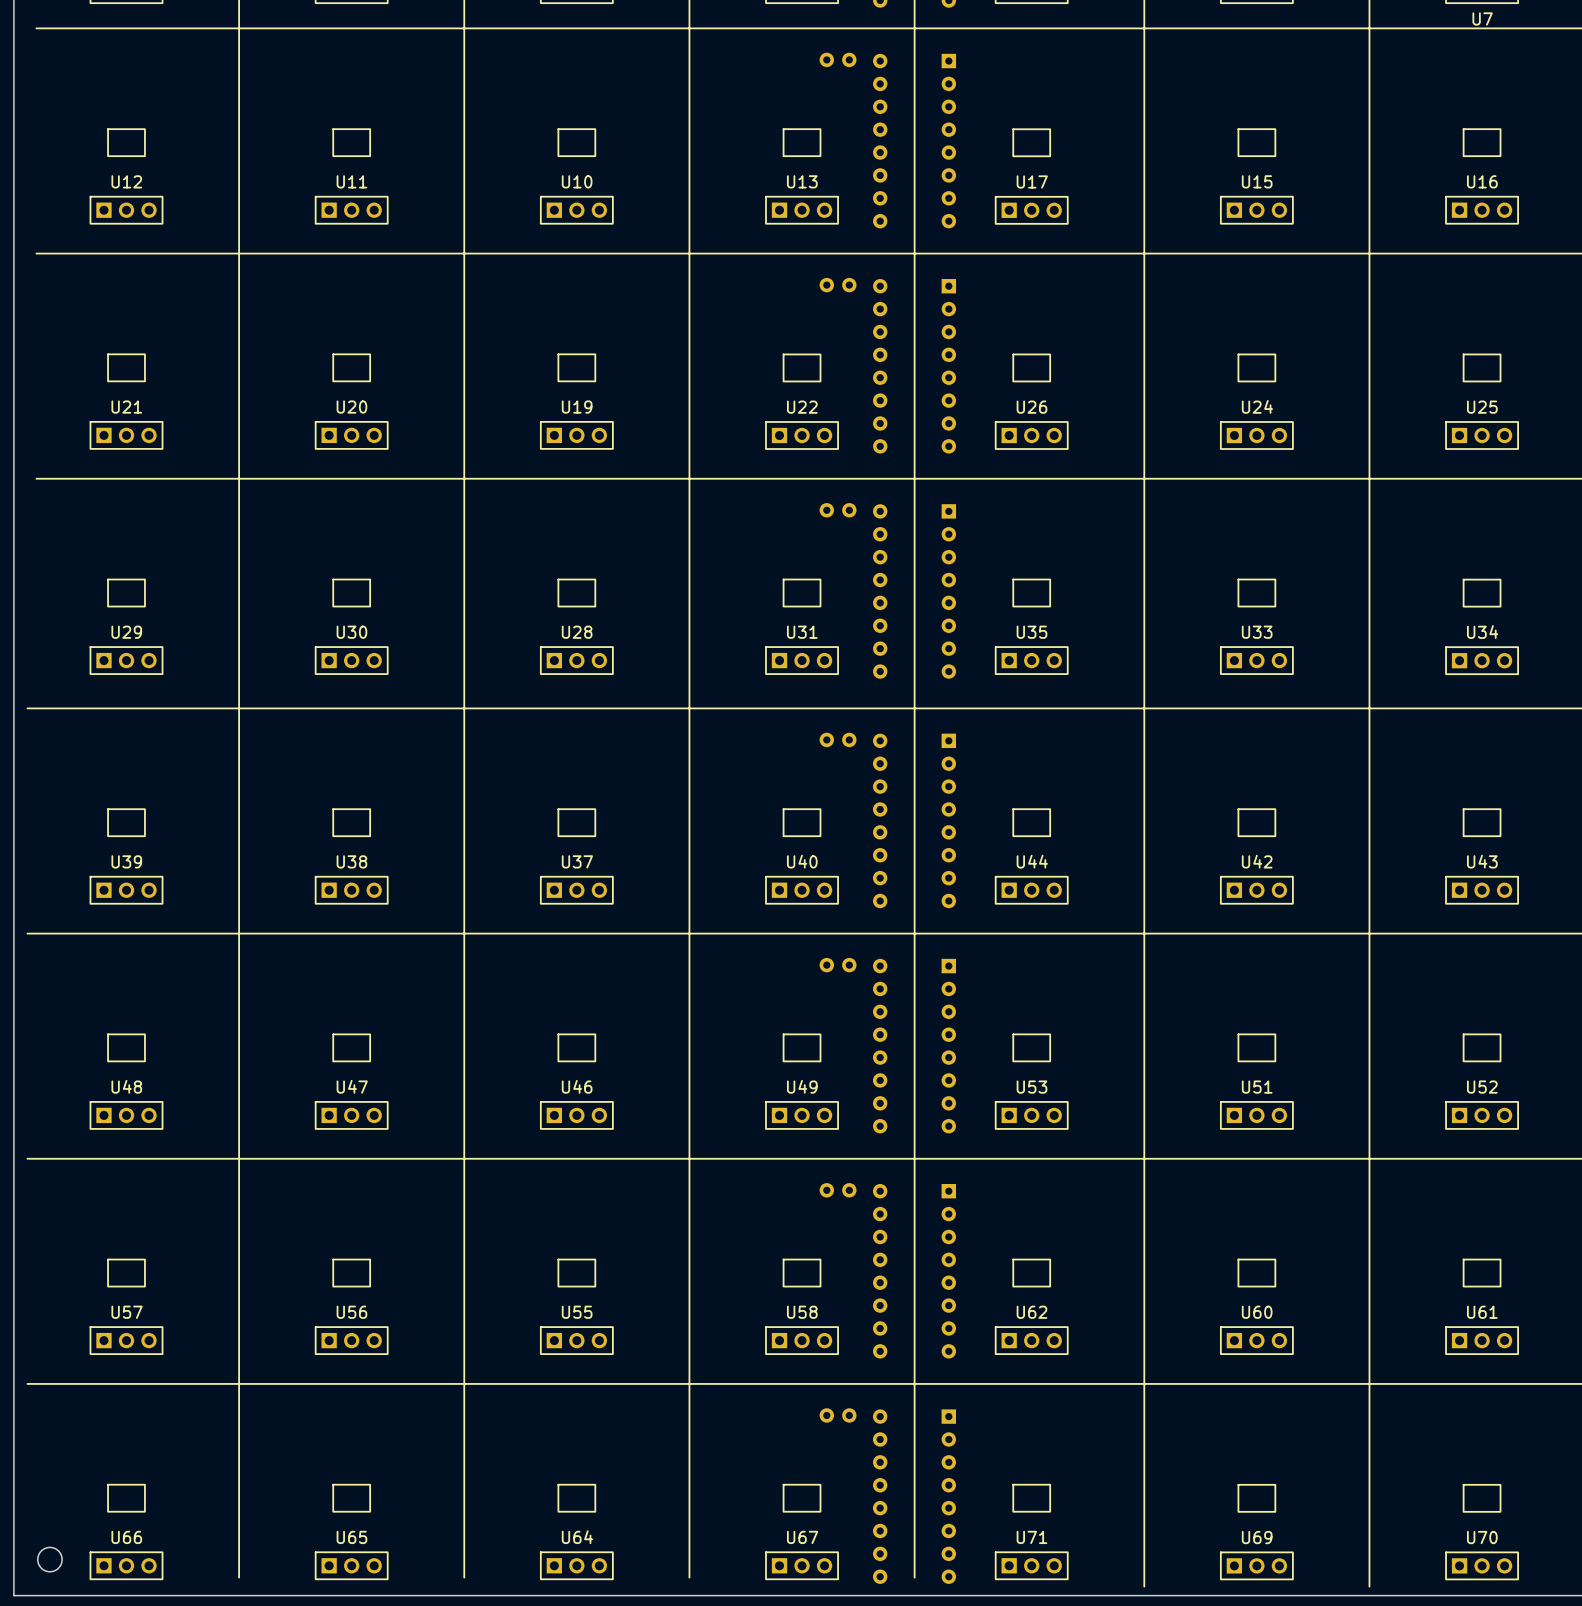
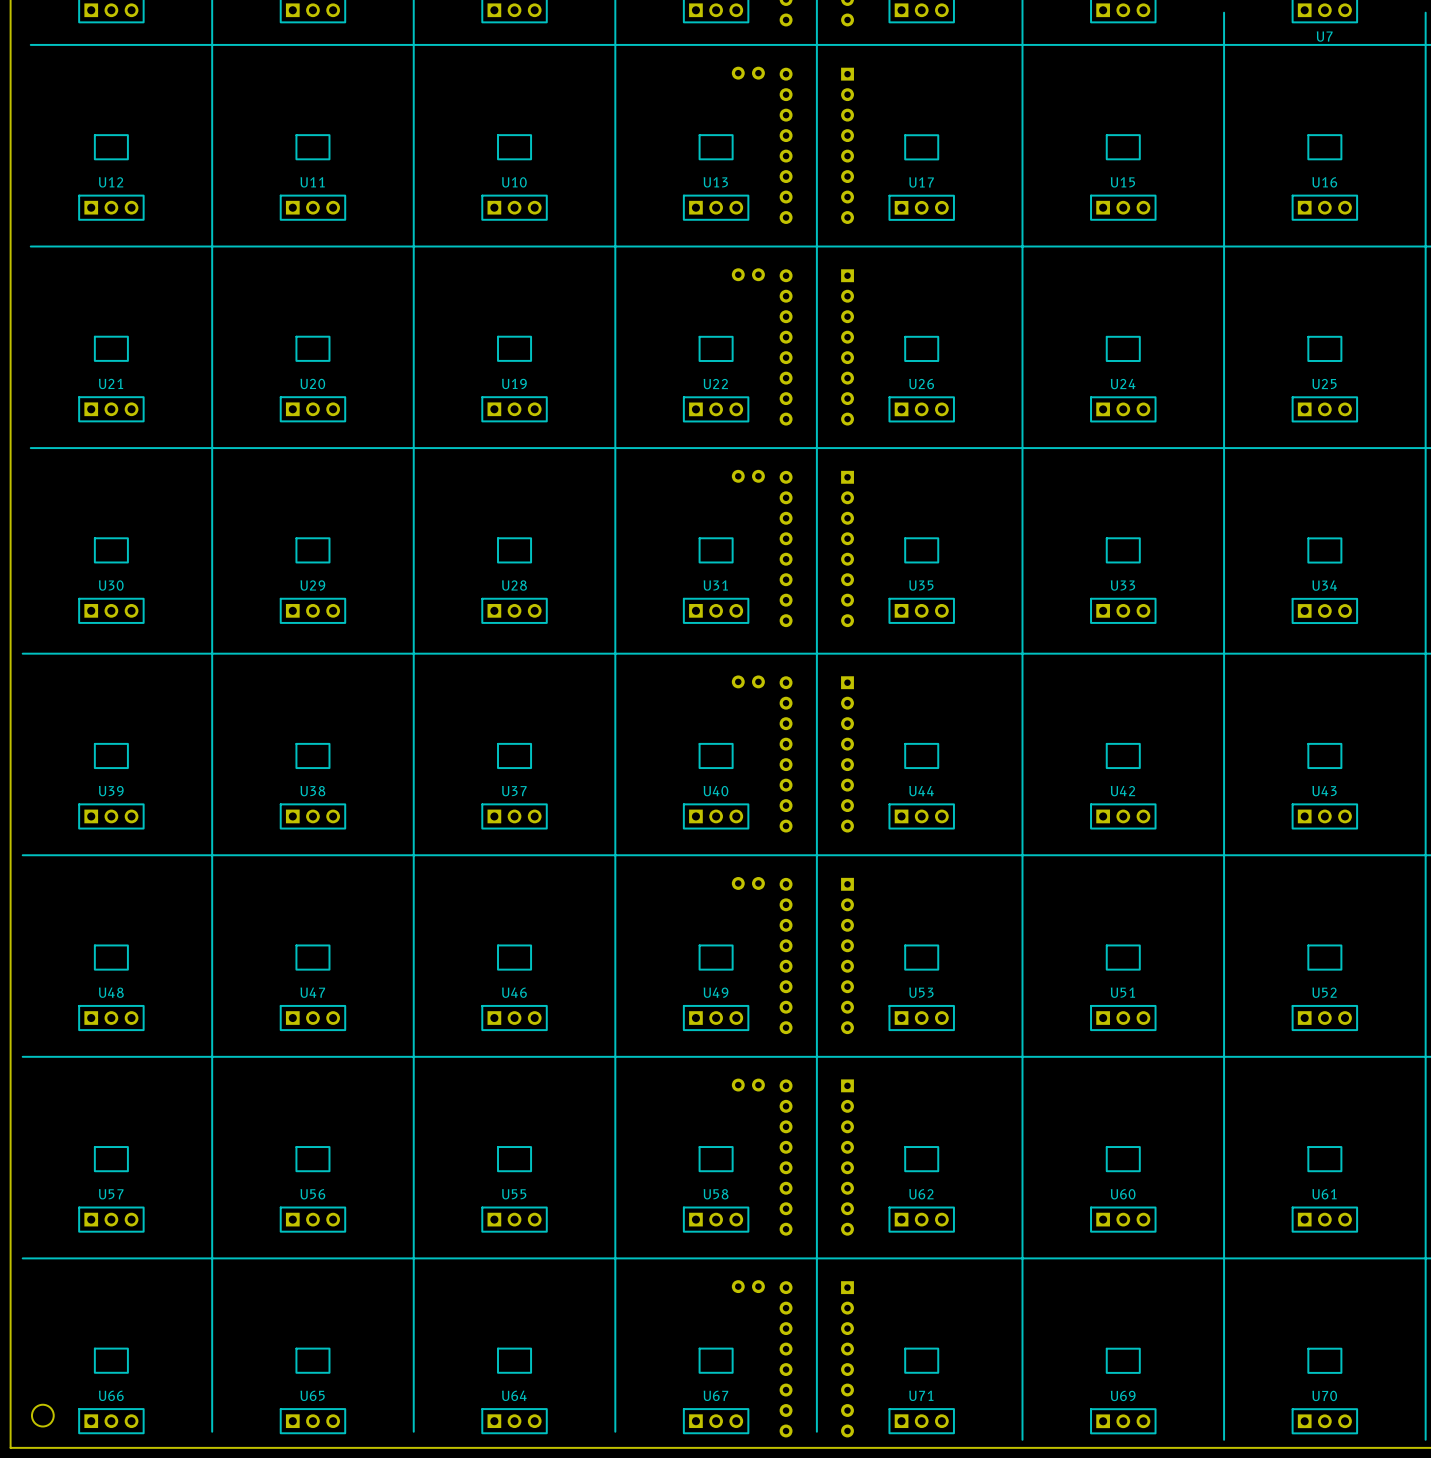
U29 name: U29 (126, 632) -> U30 (111, 585)
U30 name: U30 (351, 632) -> U29 (312, 585)

